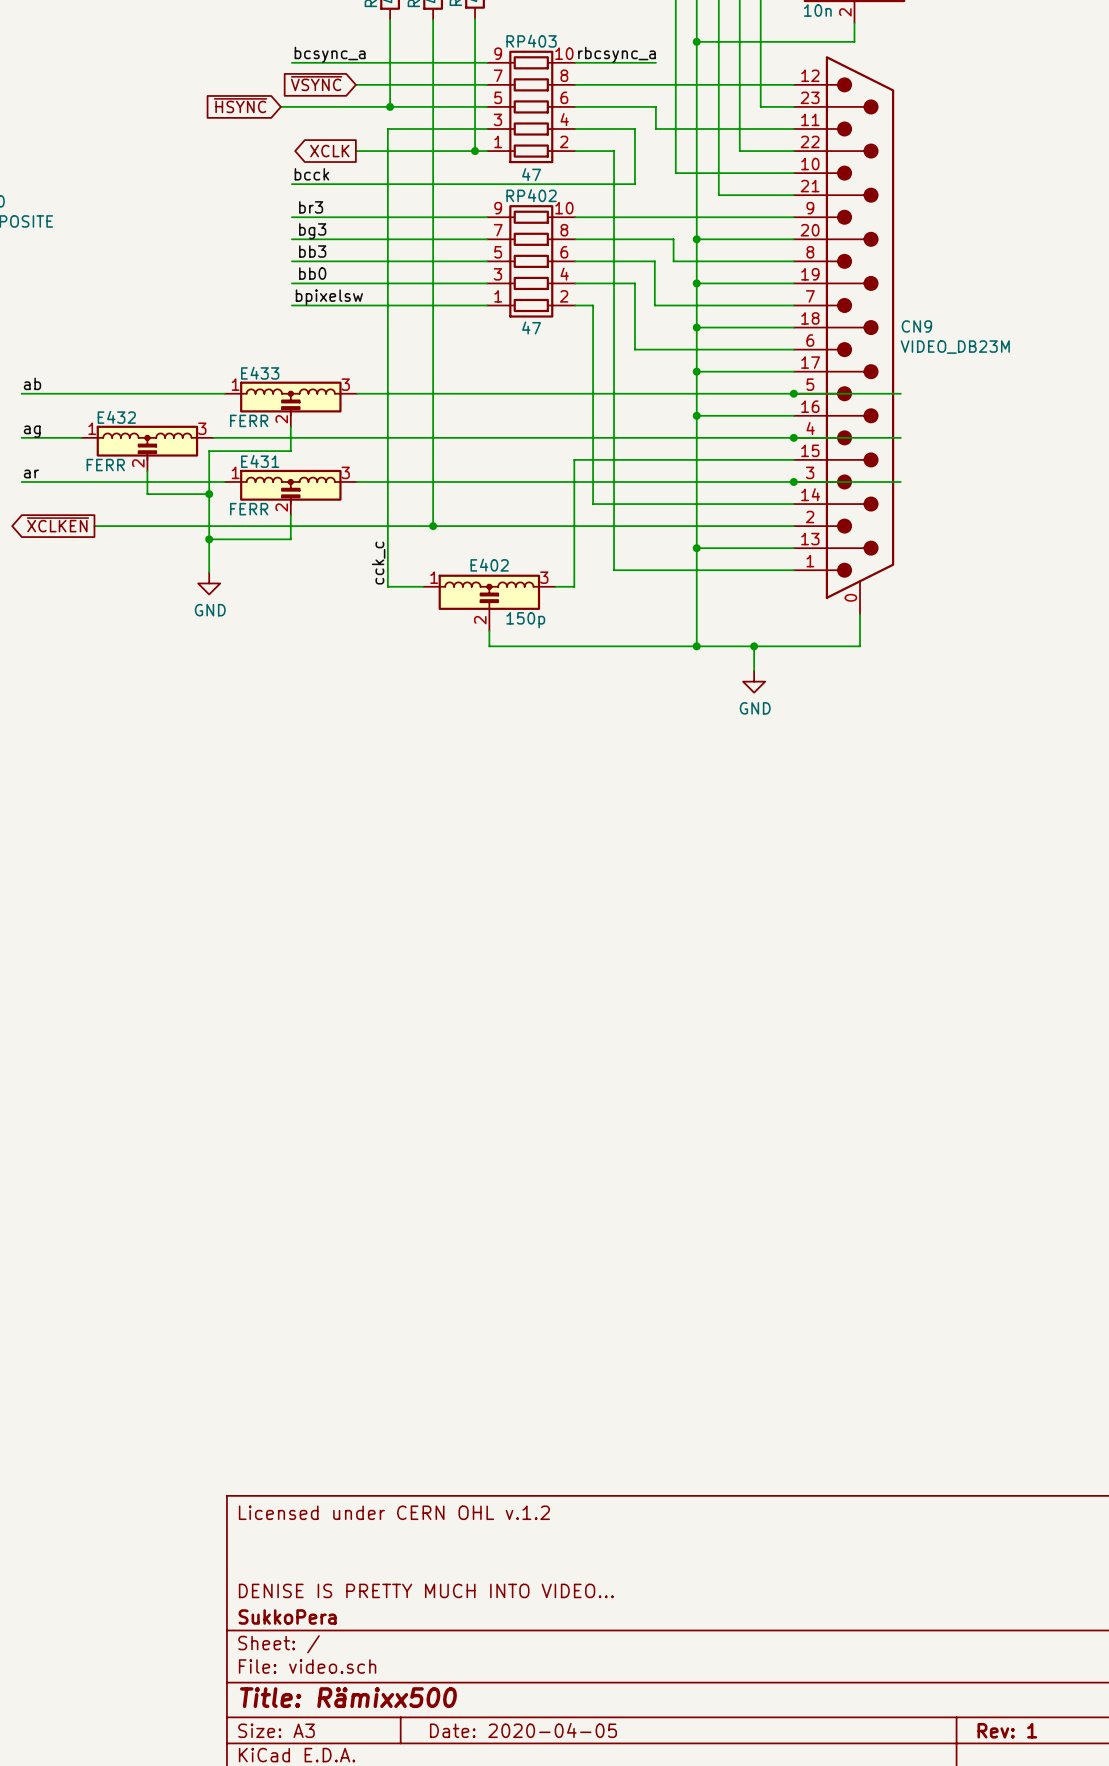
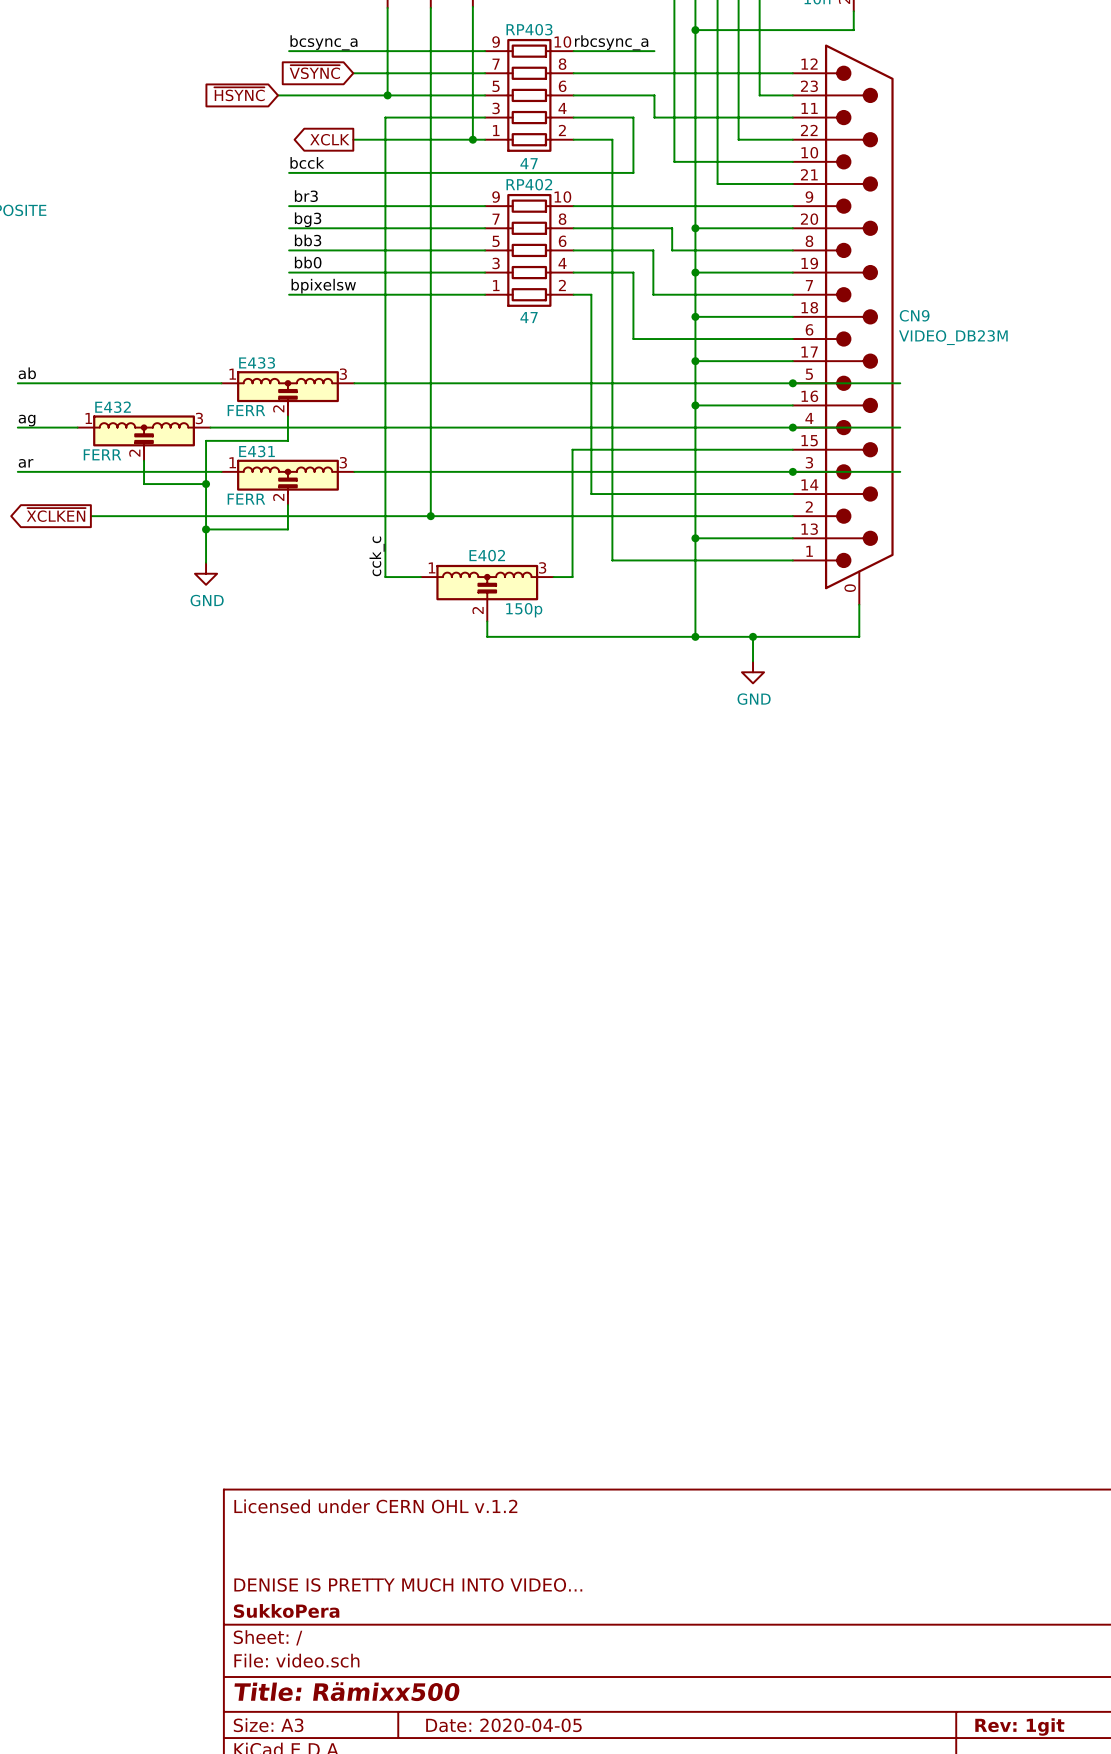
title block: Rev: 1 (1007, 1730) -> Rev: 1git (1019, 1726)

